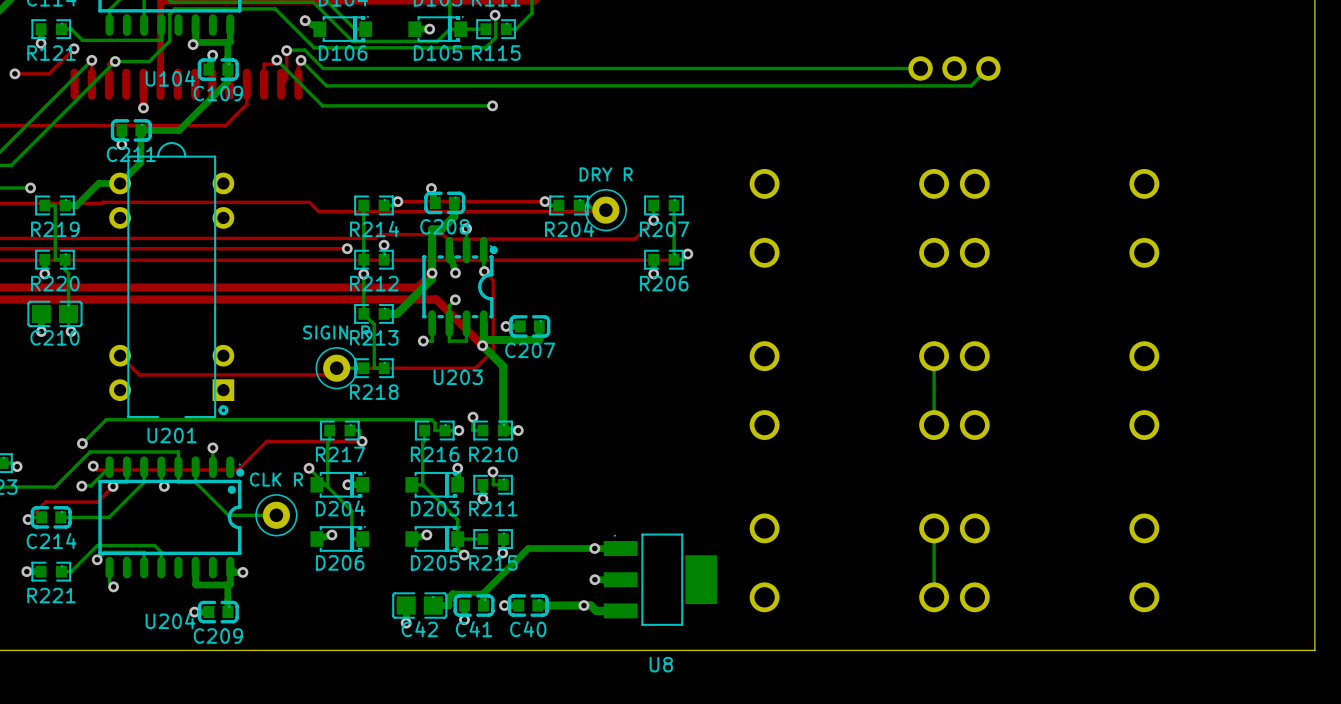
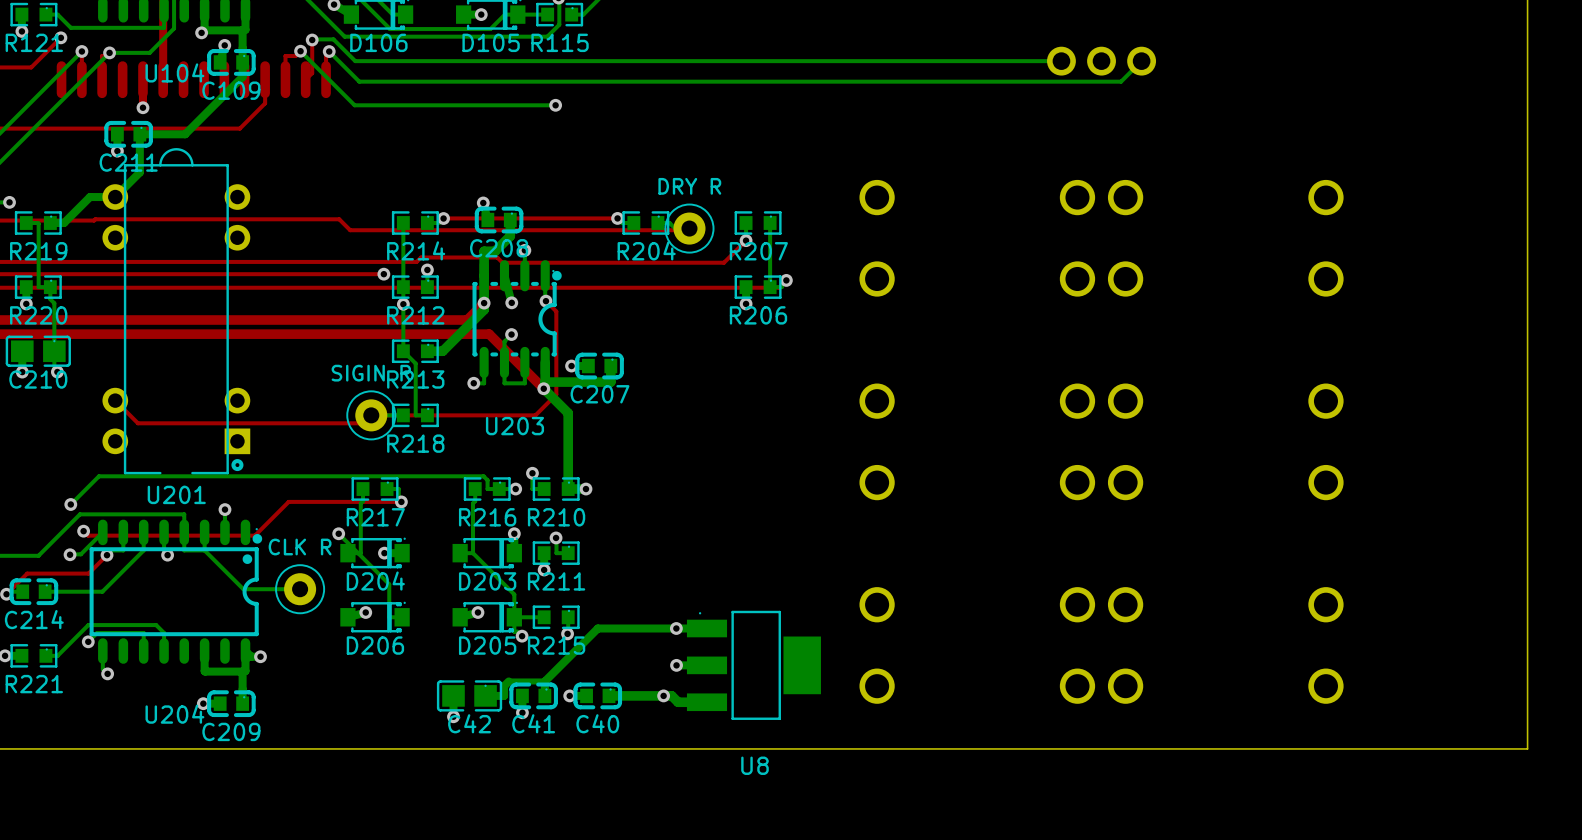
bottom track: (934, 356) (934, 425) -> none
bottom track: (934, 528) (934, 597) -> none

